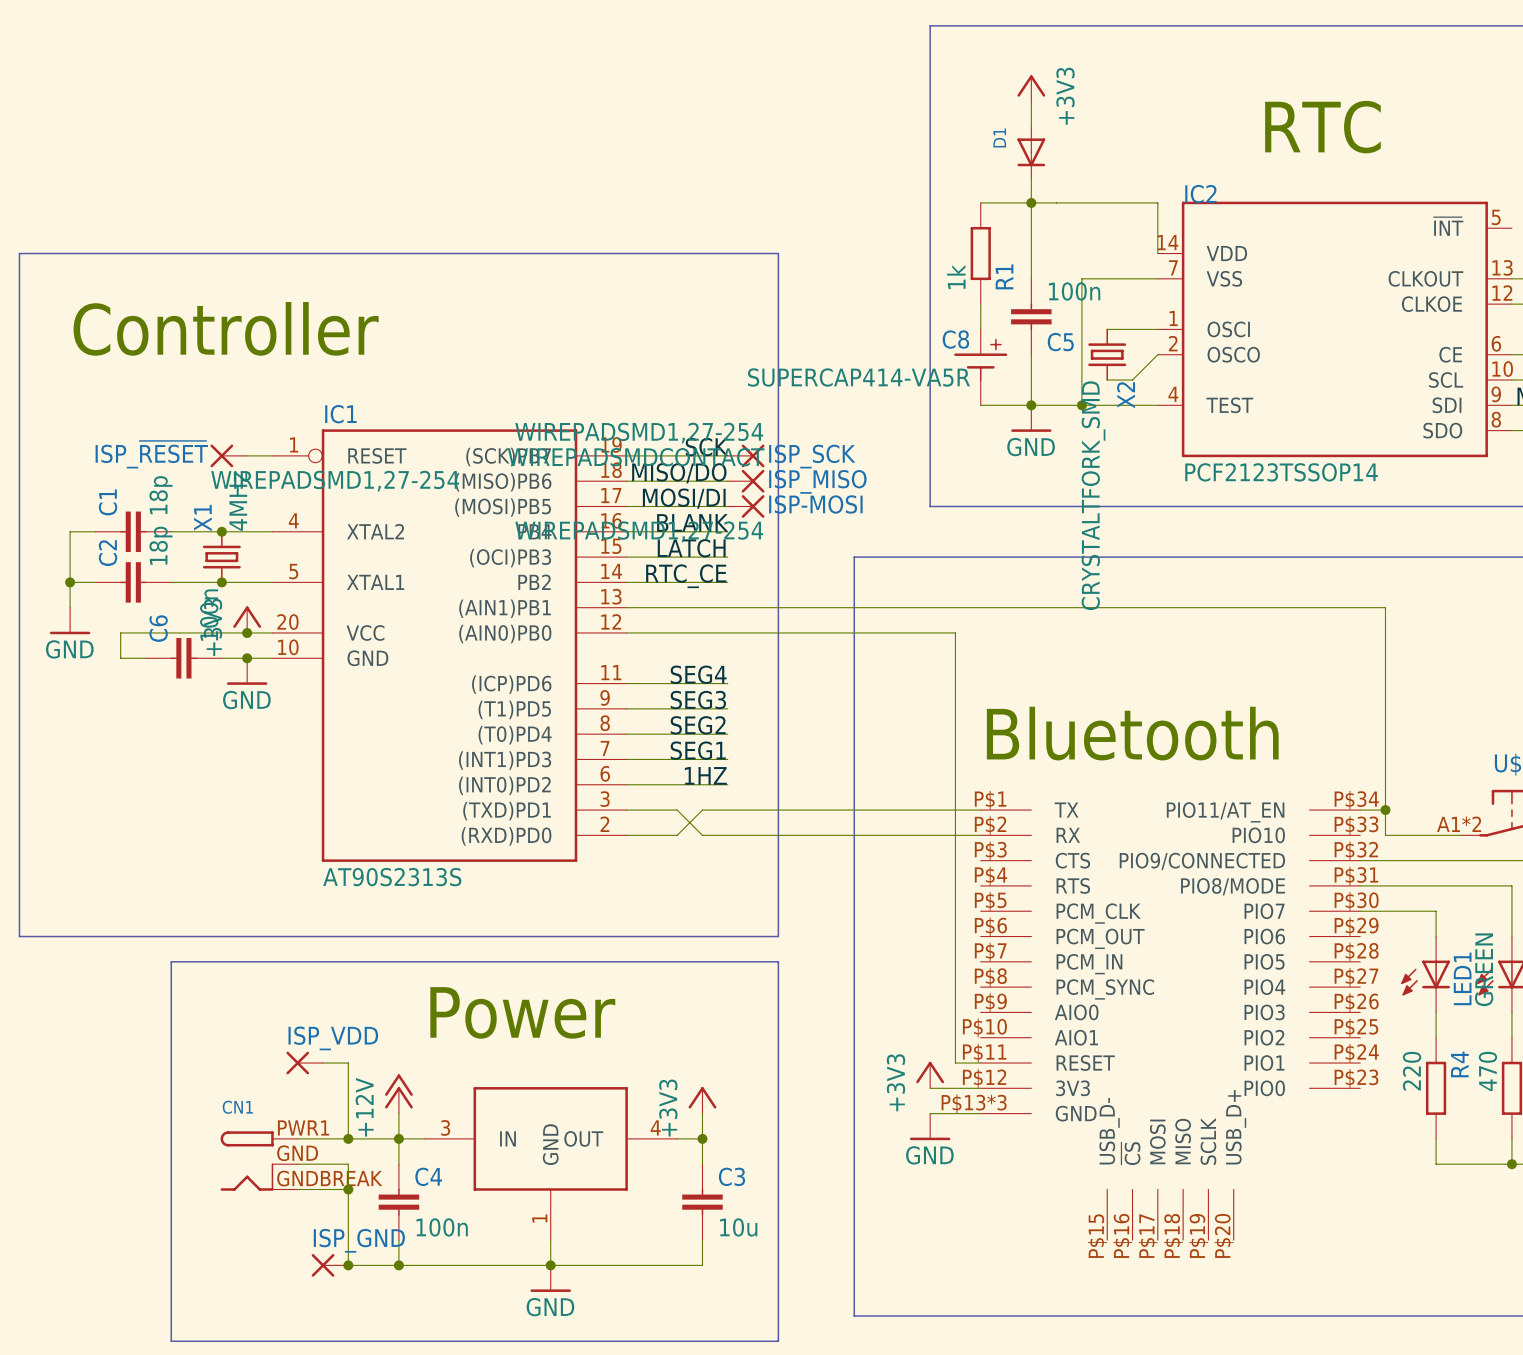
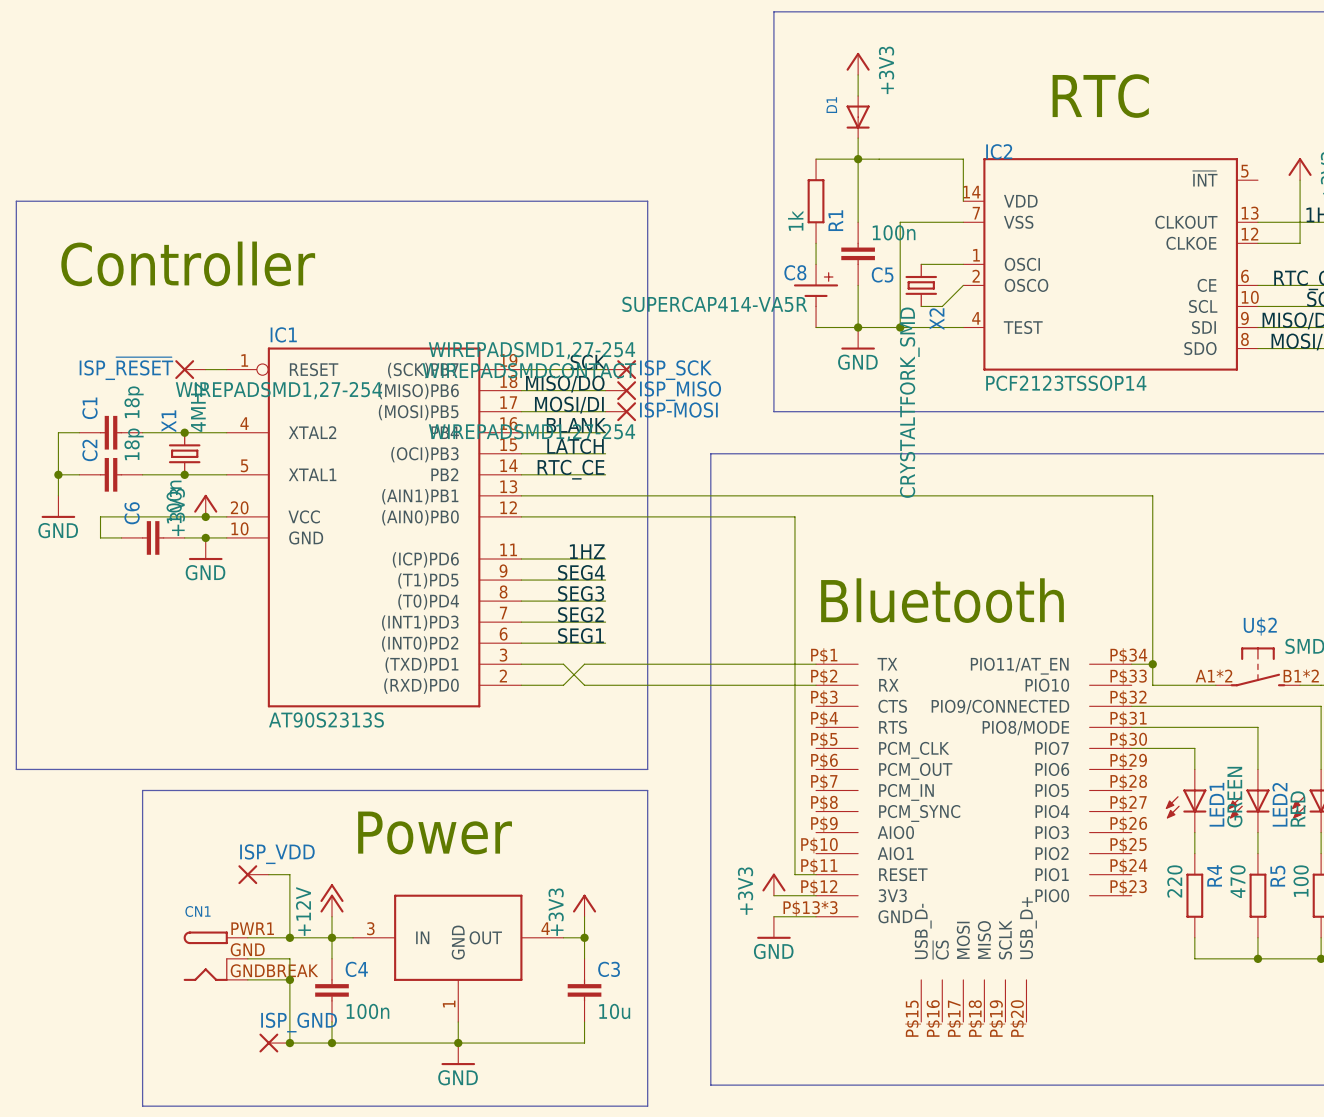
label: SEG4 (698, 674) -> 1HZ (587, 551)
label: SEG3 (698, 700) -> SEG4 (581, 572)
label: SEG2 (698, 725) -> SEG3 (581, 593)
label: SEG1 (698, 750) -> SEG2 (580, 614)
label: 1HZ (705, 775) -> SEG1 (580, 635)

